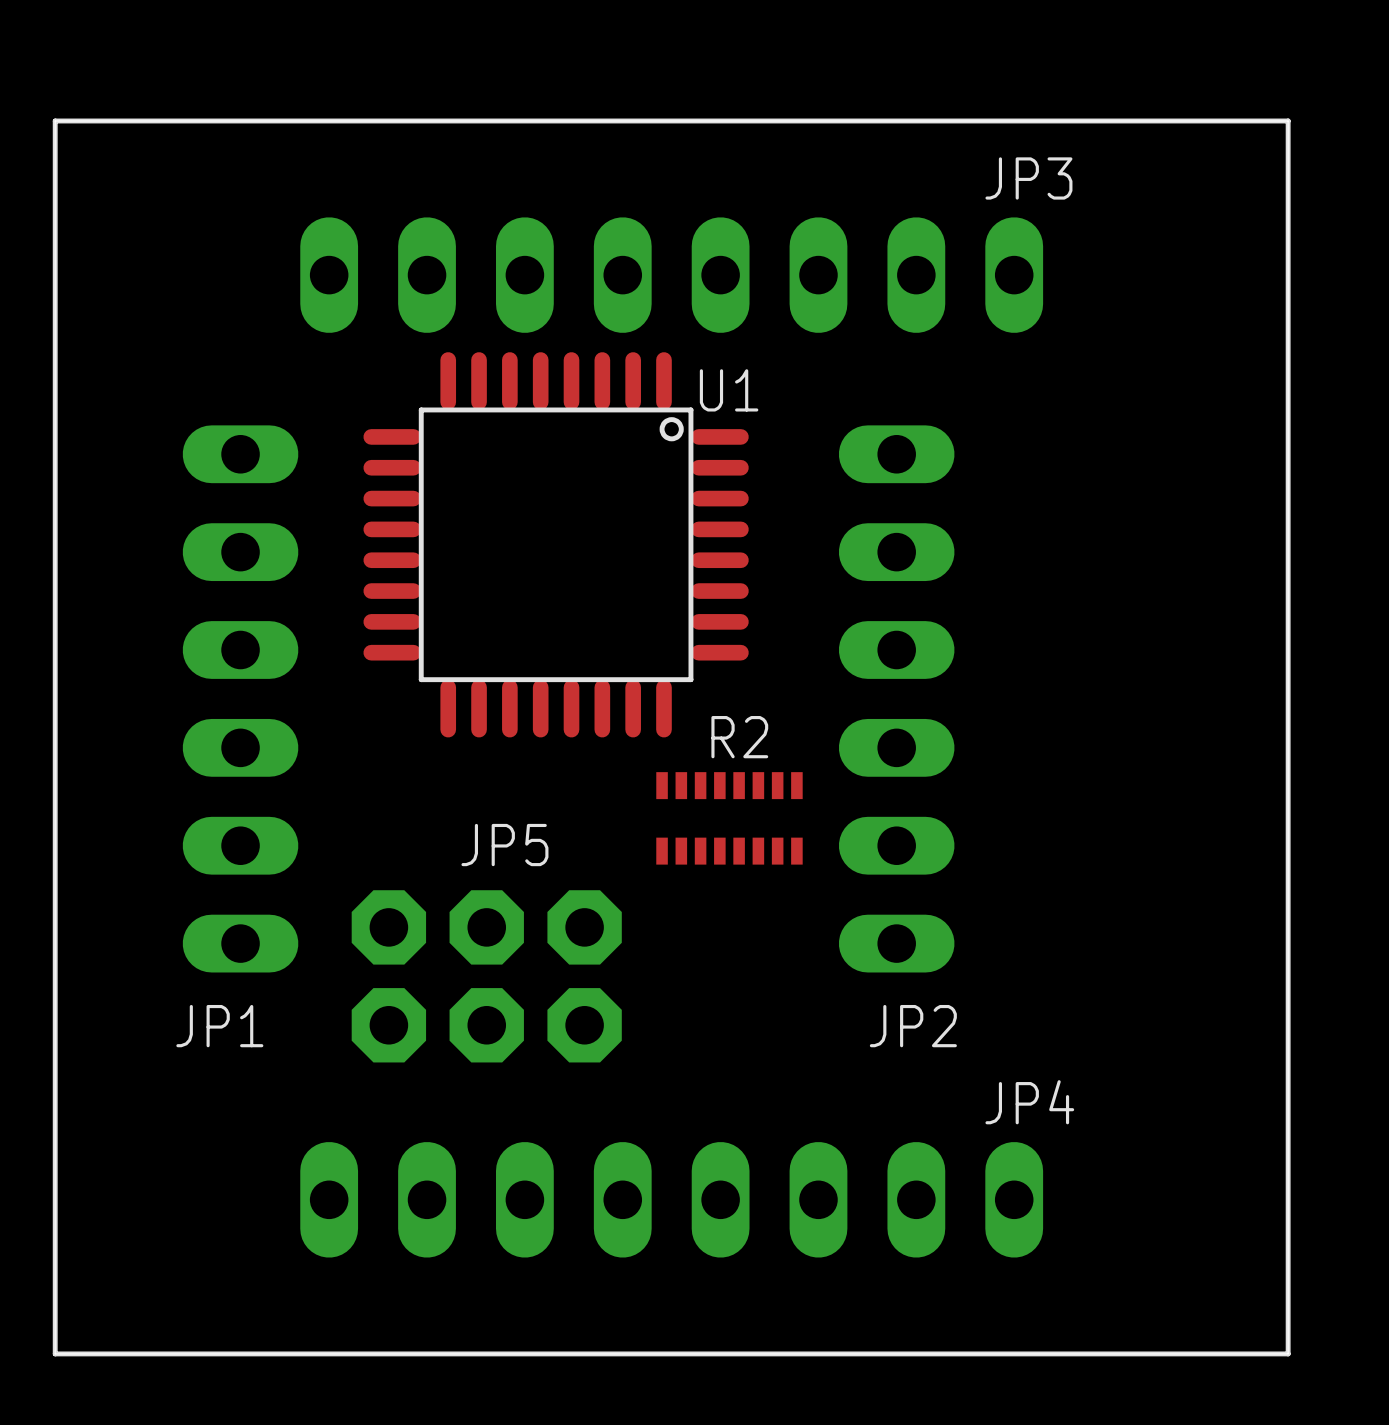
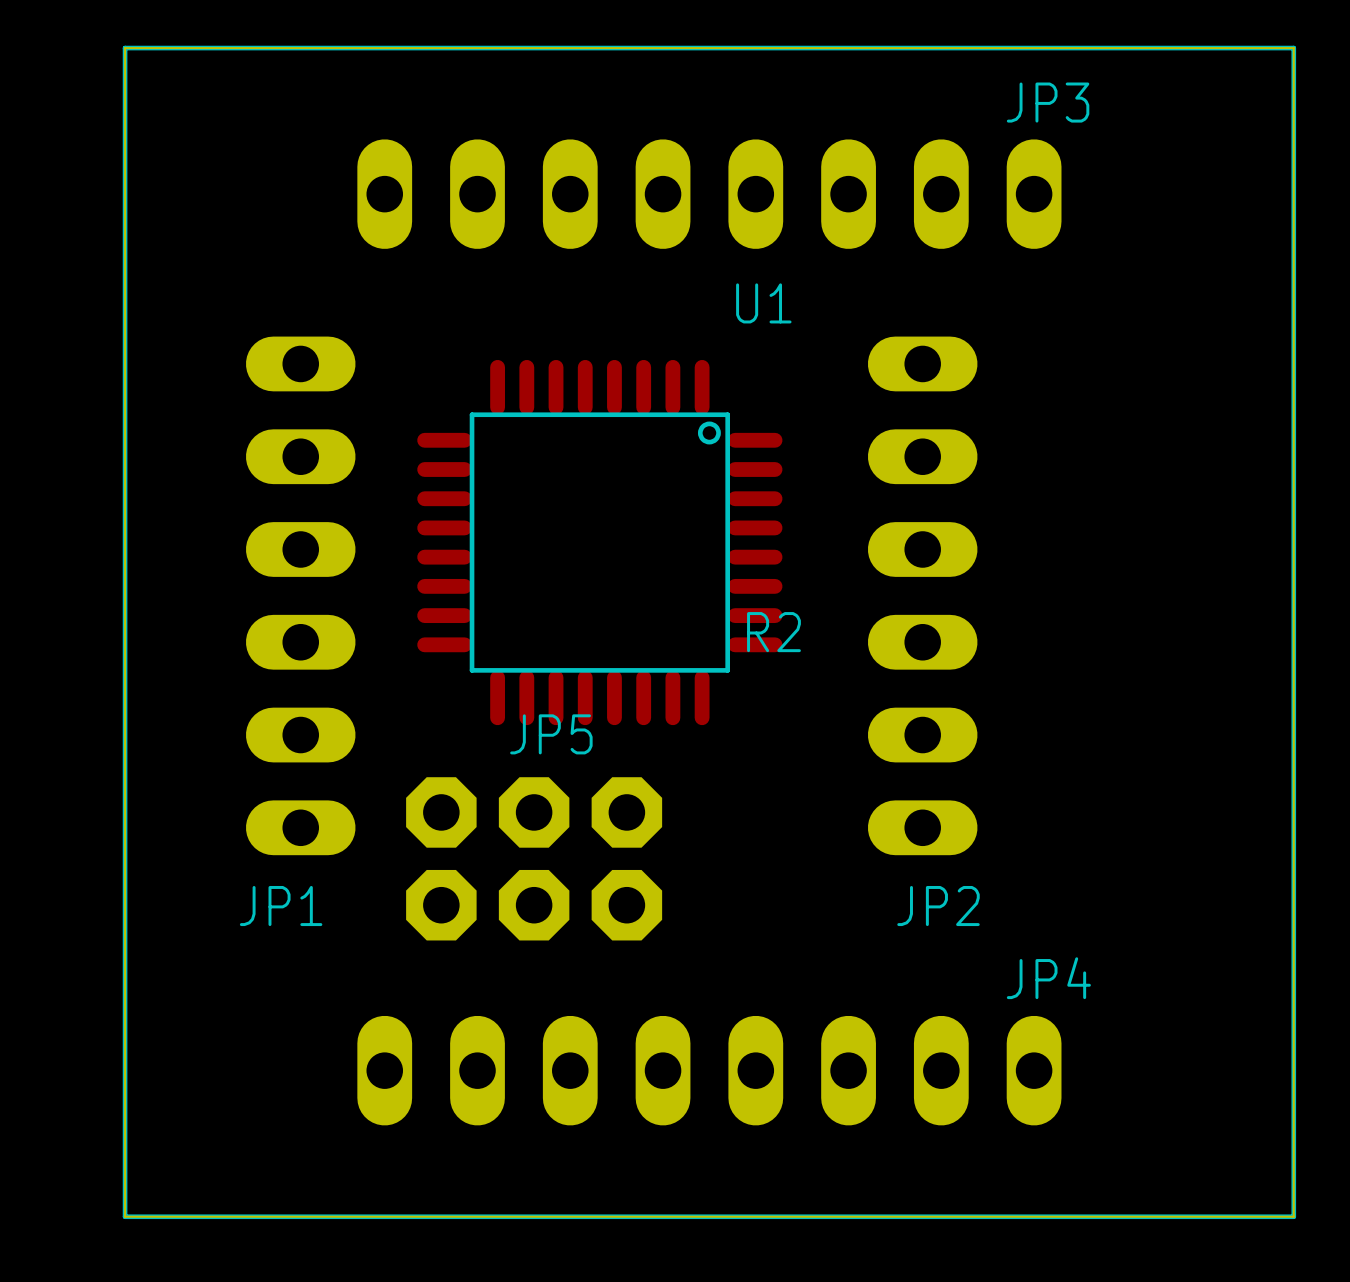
part position: (556, 544) -> (599, 542)
part: (729, 818) -> none

